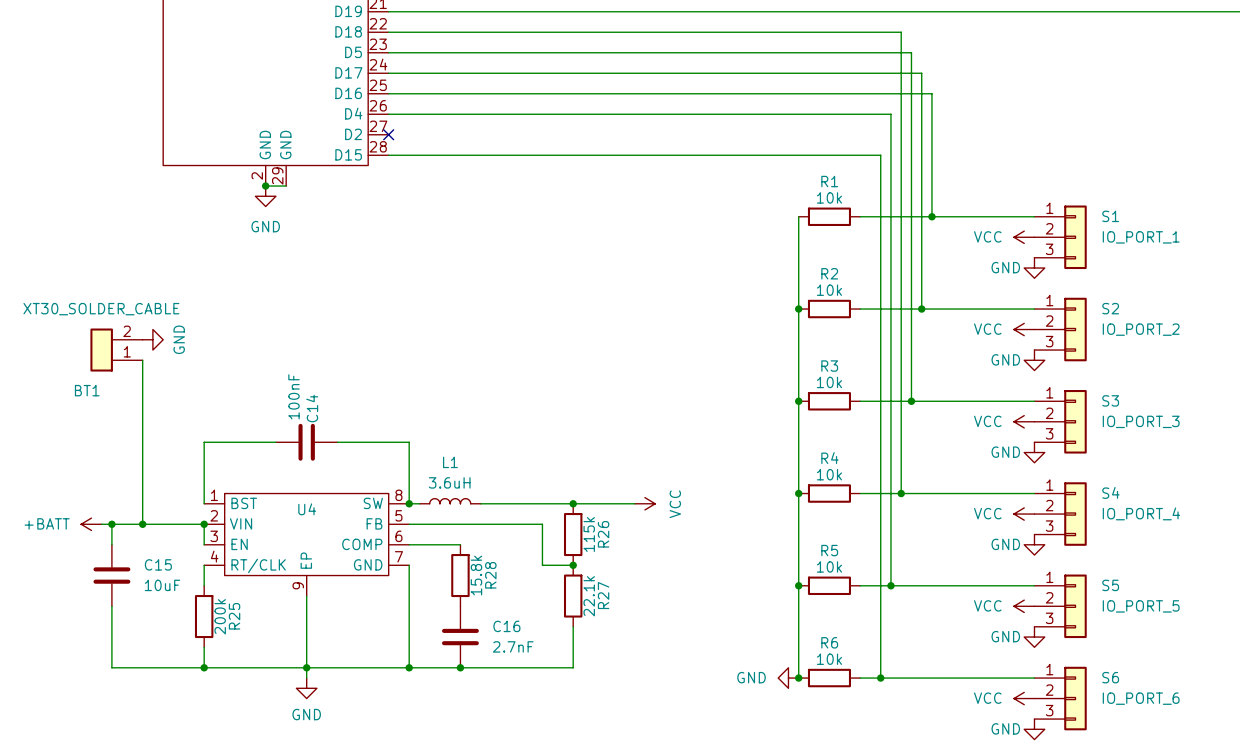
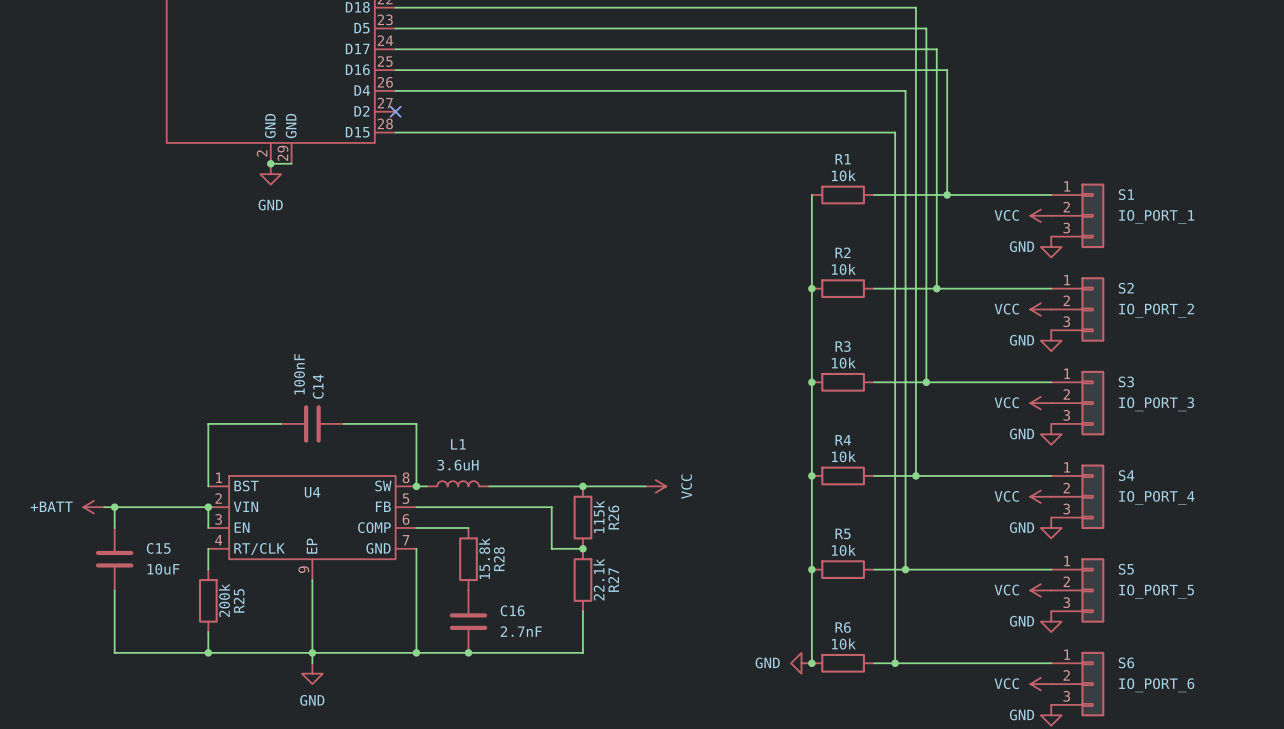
power symbol: GND (152, 339) -> none
BT1: XT30_SOLDER_CABLE (116, 350) -> none
wire: (142, 360) (142, 524) -> none
junction: (142, 524) -> none

